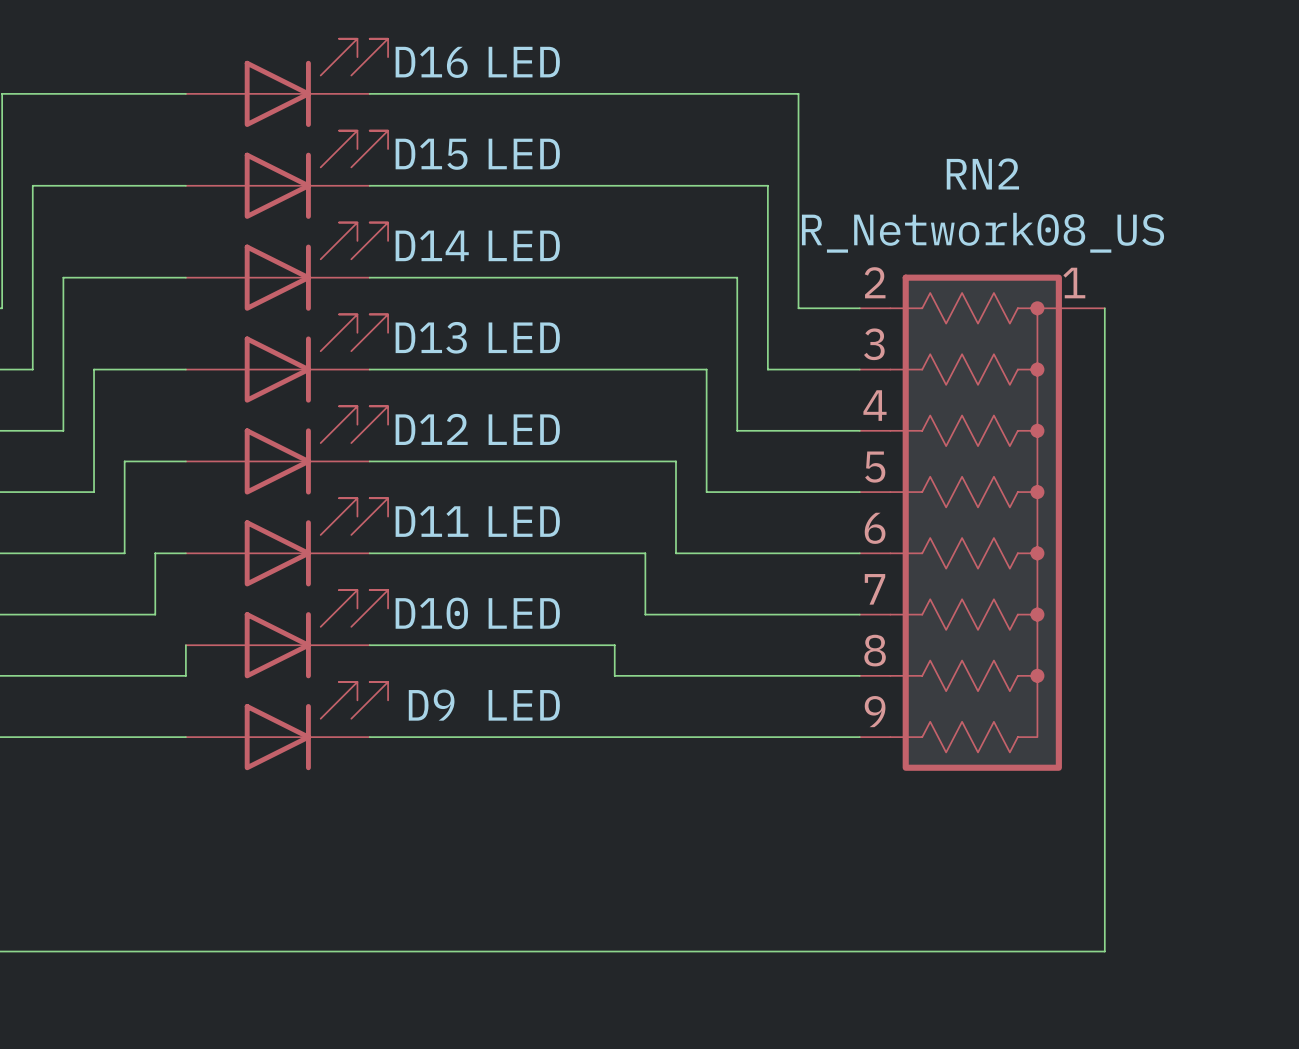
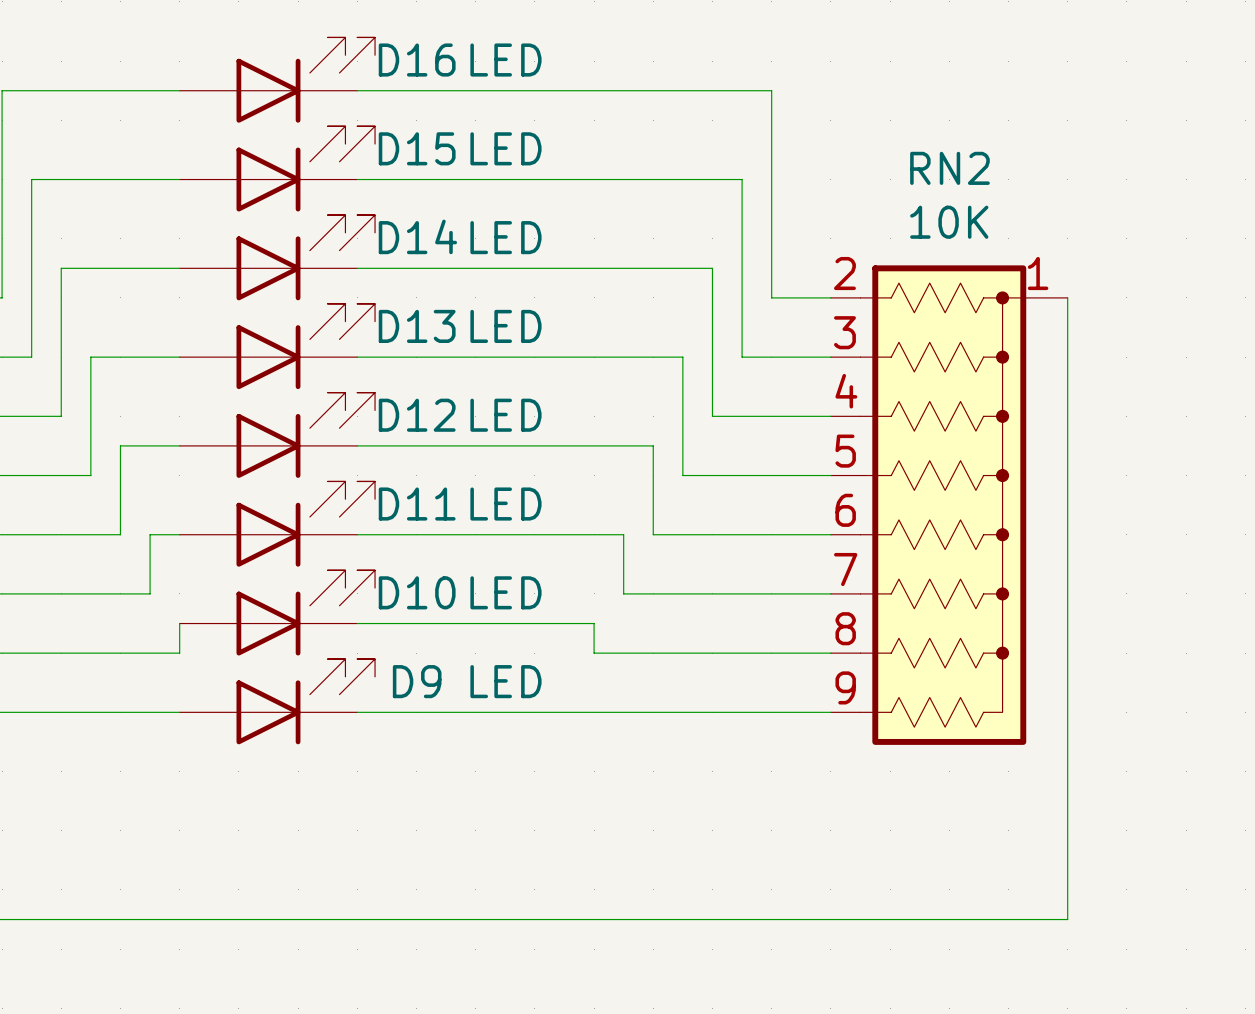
RN2 value: R_Network08_US (983, 232) -> 10K (949, 222)

